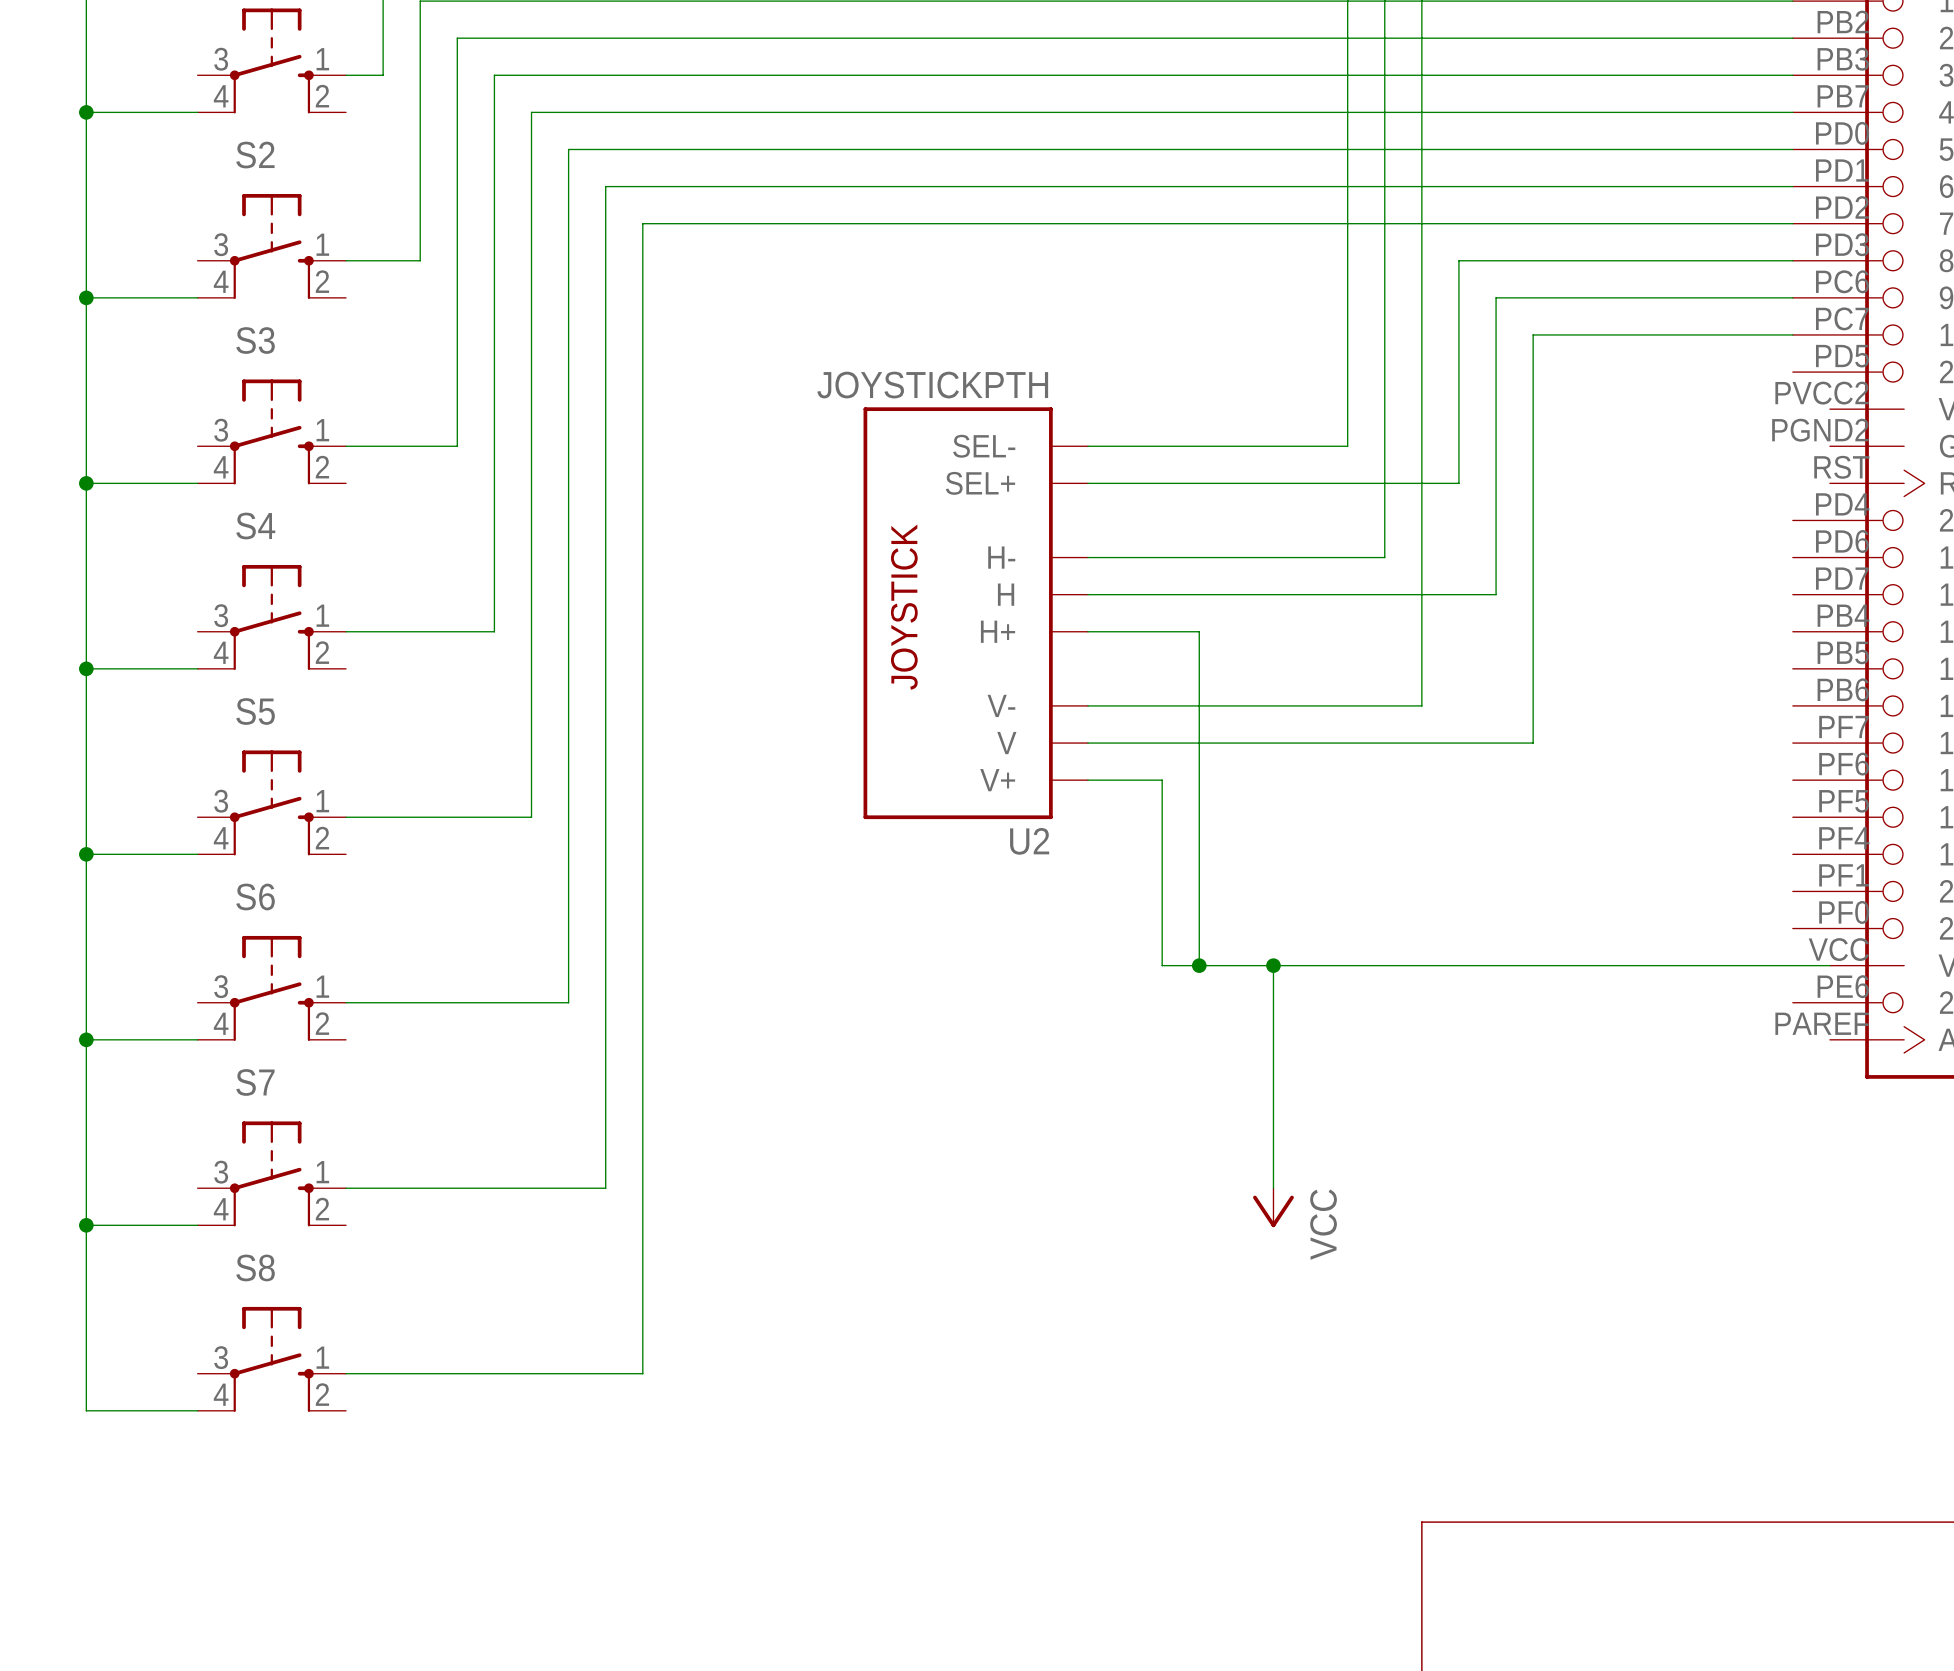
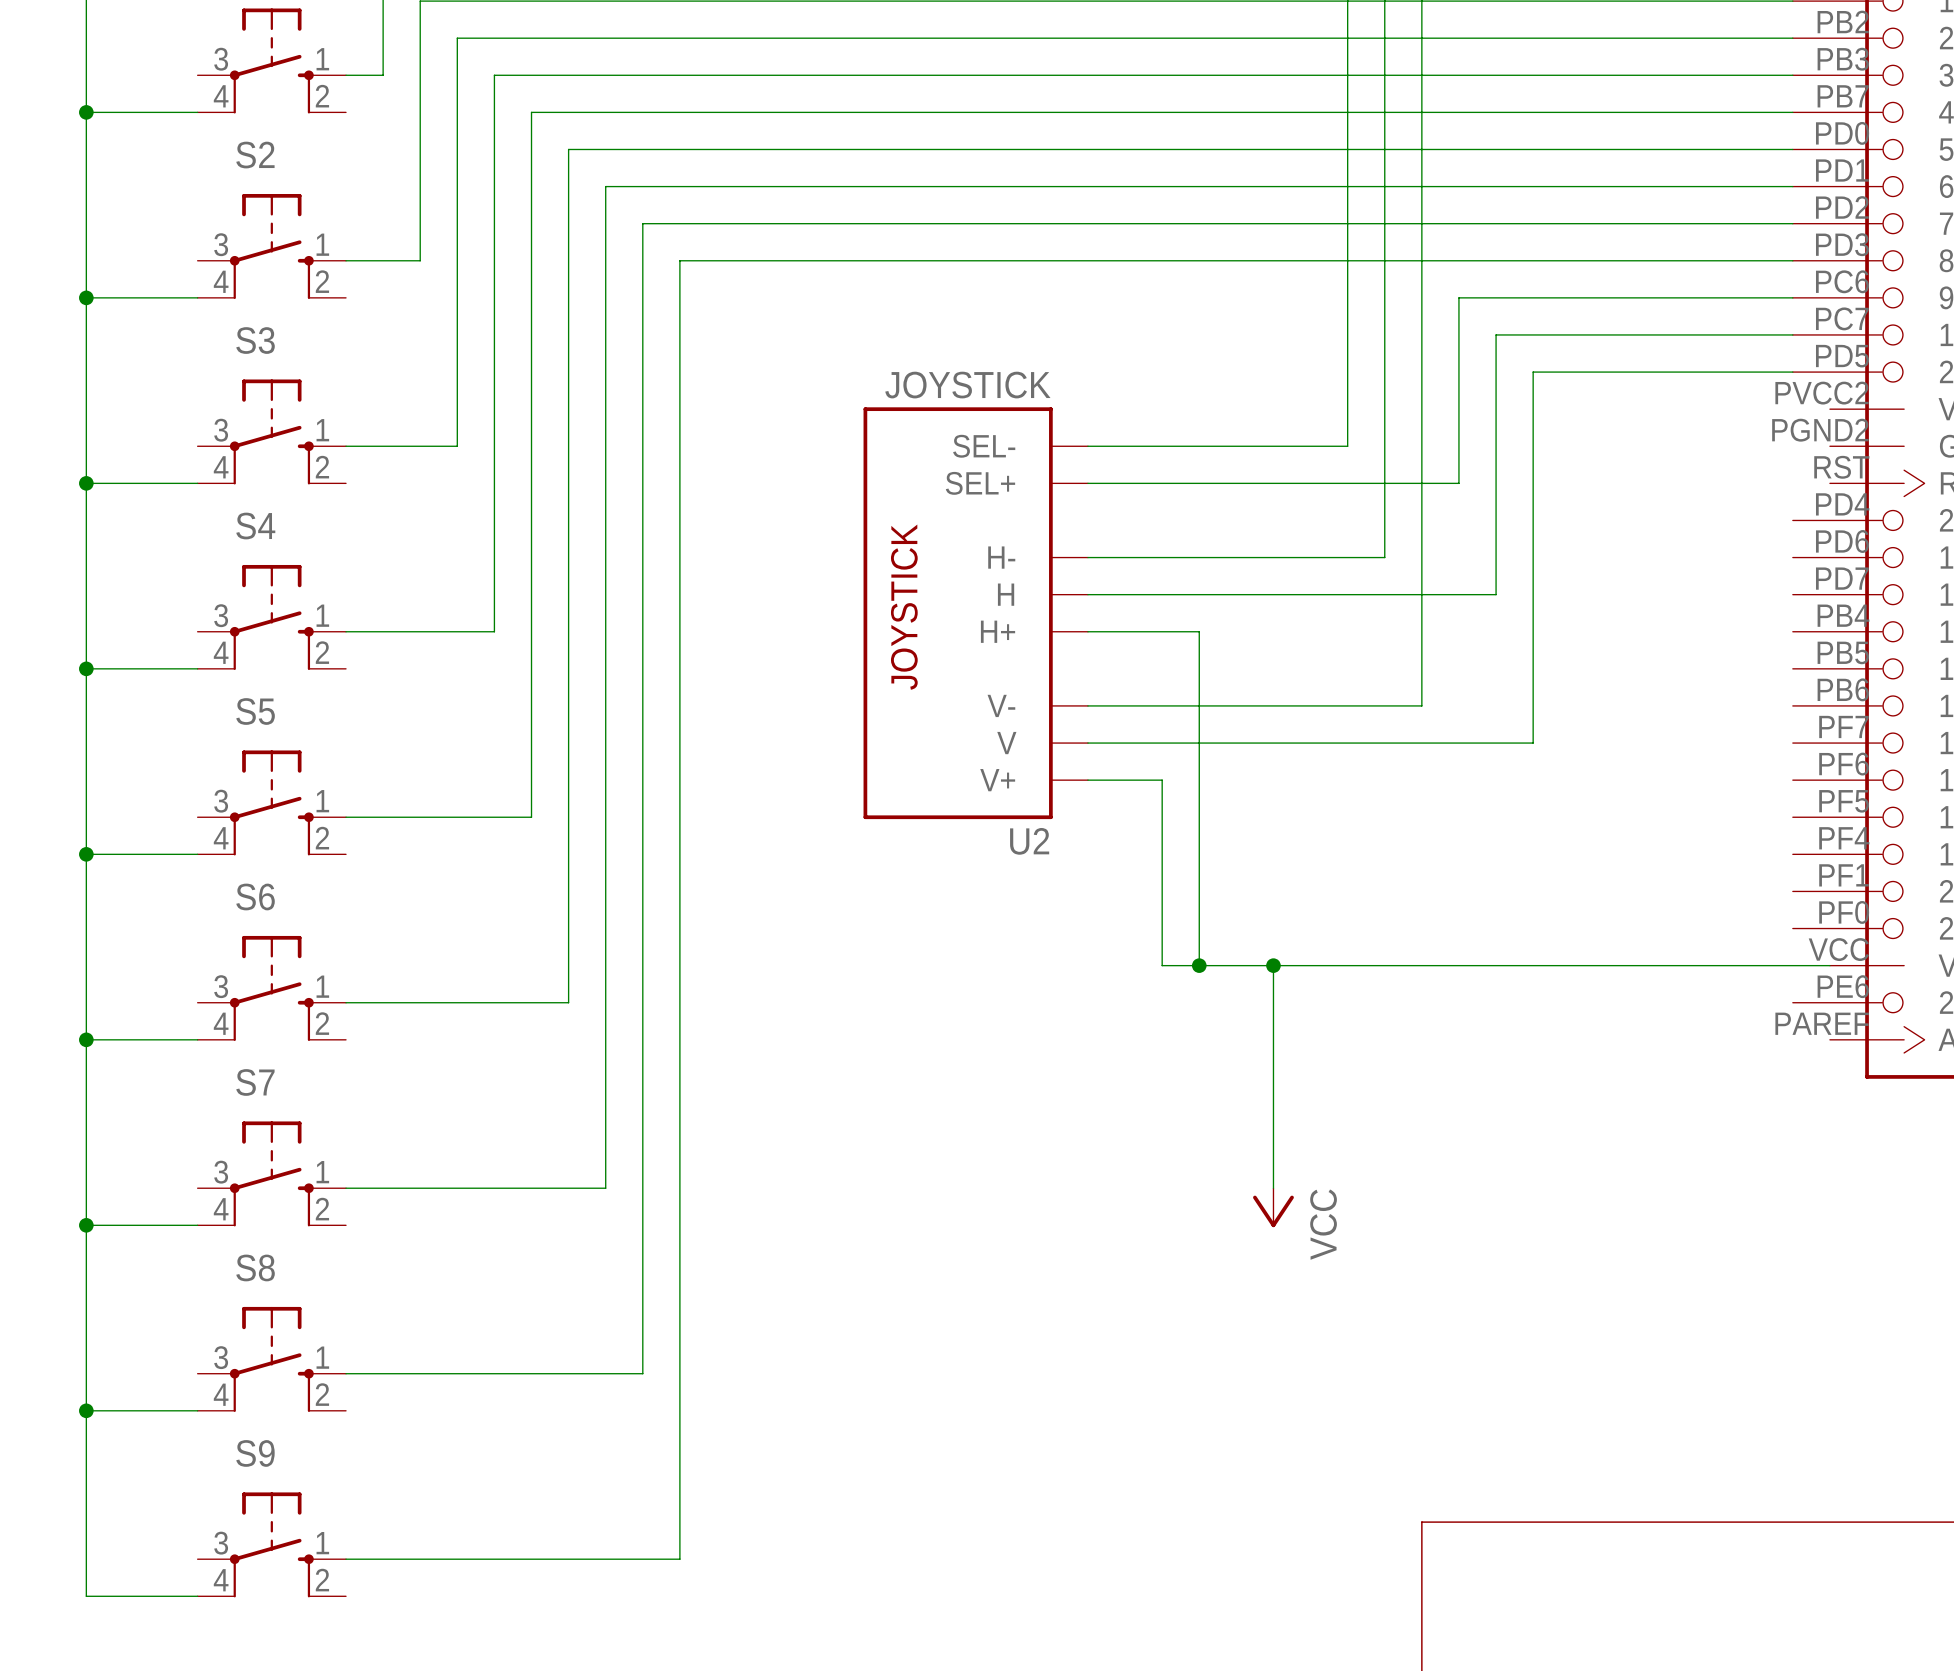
wire: (1458, 260) (1458, 297) -> (1458, 260) (679, 260) (679, 1559) (346, 1559)
wire: (1496, 297) (1496, 334) -> (1496, 297) (1458, 297)
wire: (1533, 334) (1533, 372) -> (1533, 334) (1496, 334)
wire: none -> (1533, 372) (1792, 372)
U2 value: JOYSTICKPTH (932, 385) -> JOYSTICK (967, 385)
wire: none -> (86, 1410) (86, 1596) (197, 1596)
junction: none -> (86, 1410)
S9: none -> (271, 1544)

